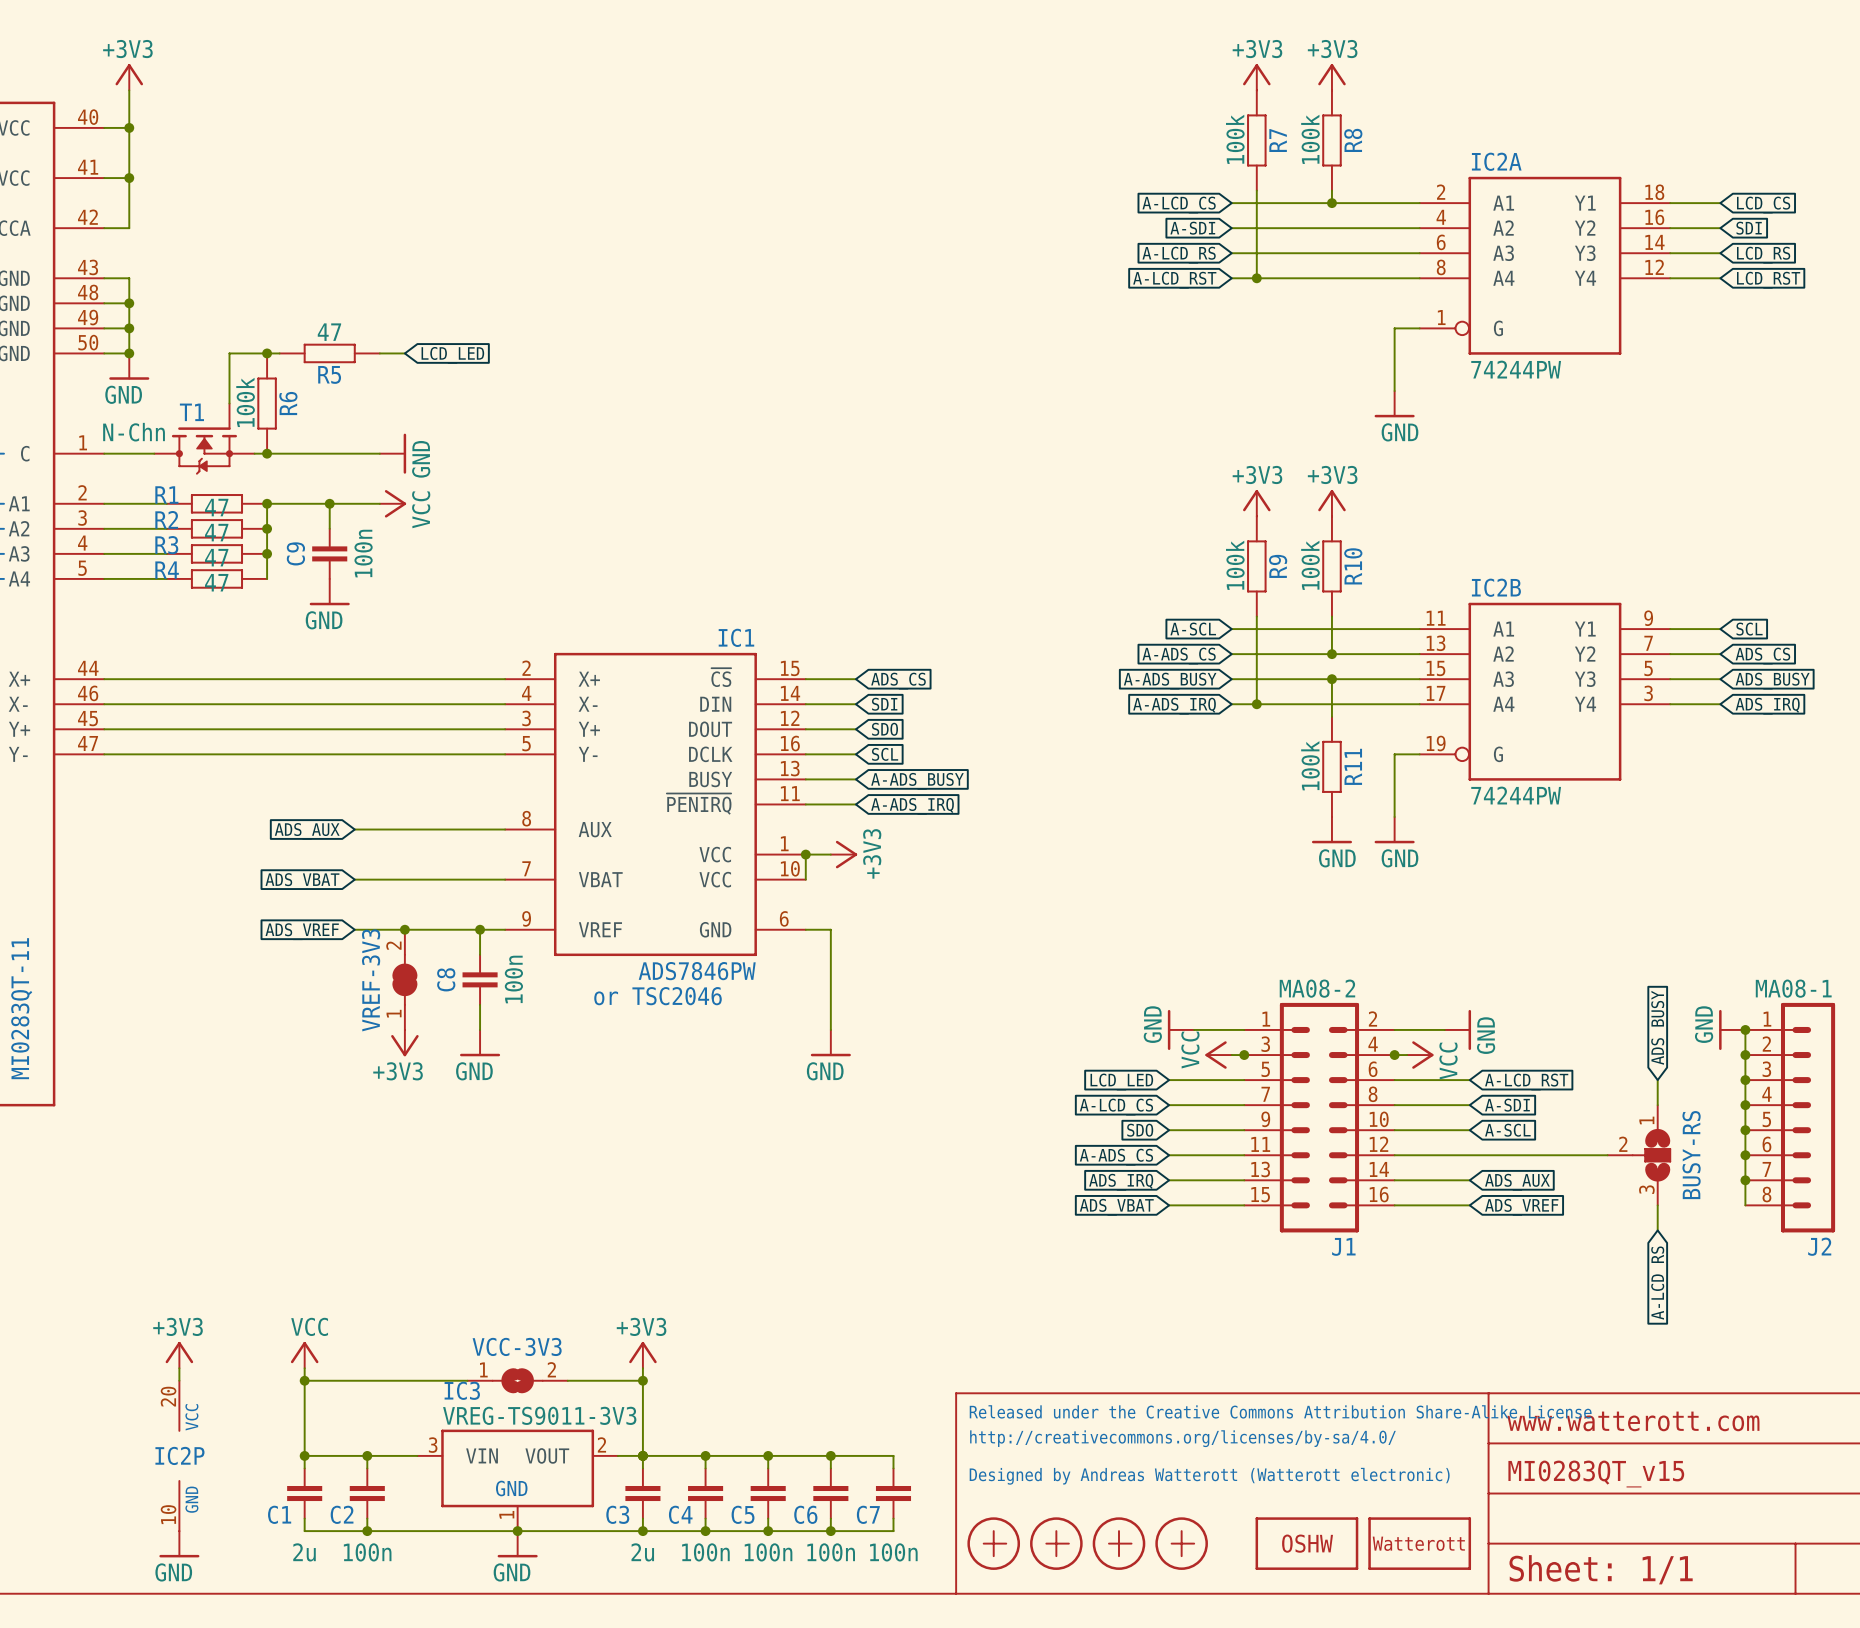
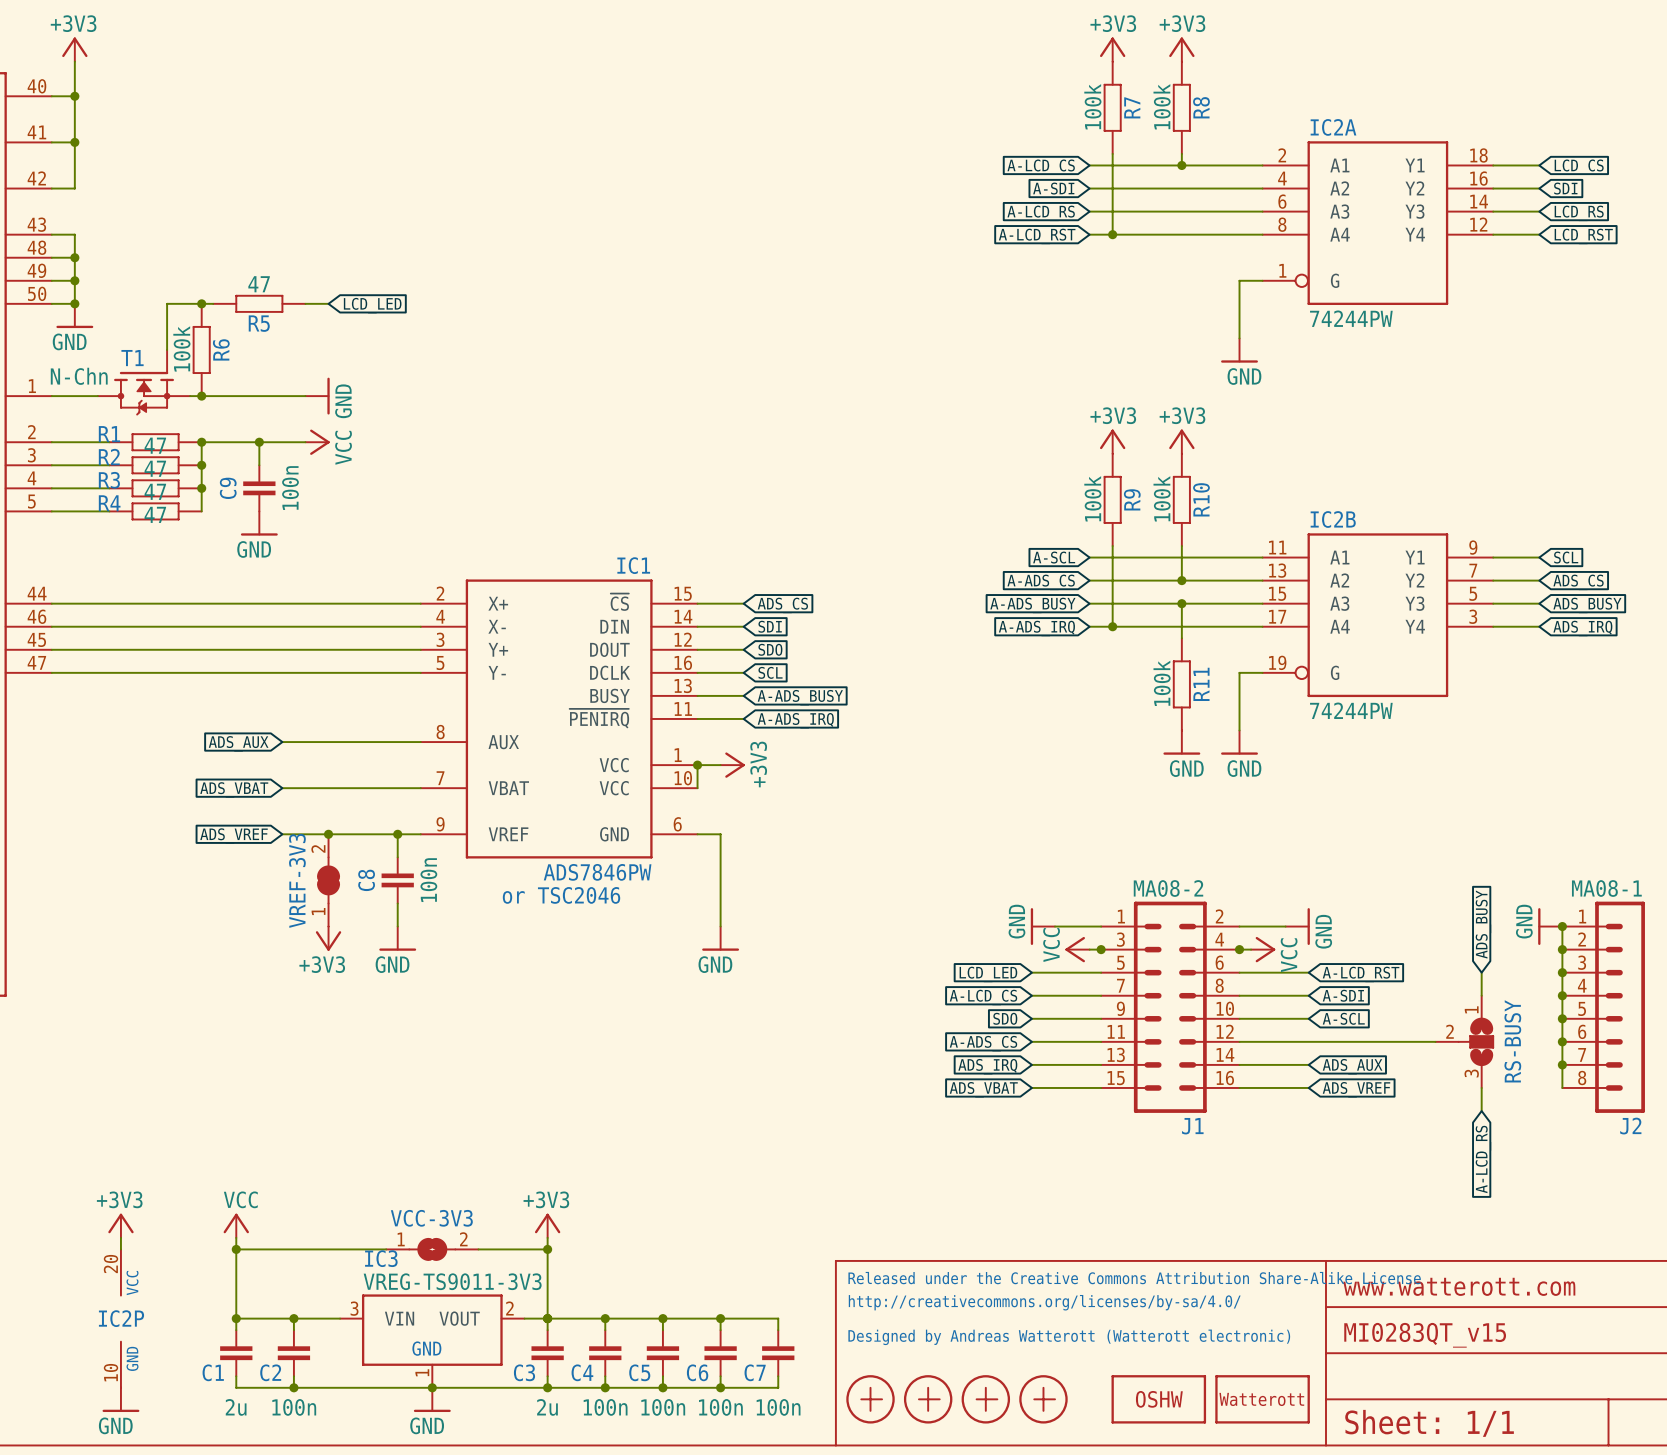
BUSY-RS name: BUSY-RS (1691, 1155) -> RS-BUSY (1512, 1041)

